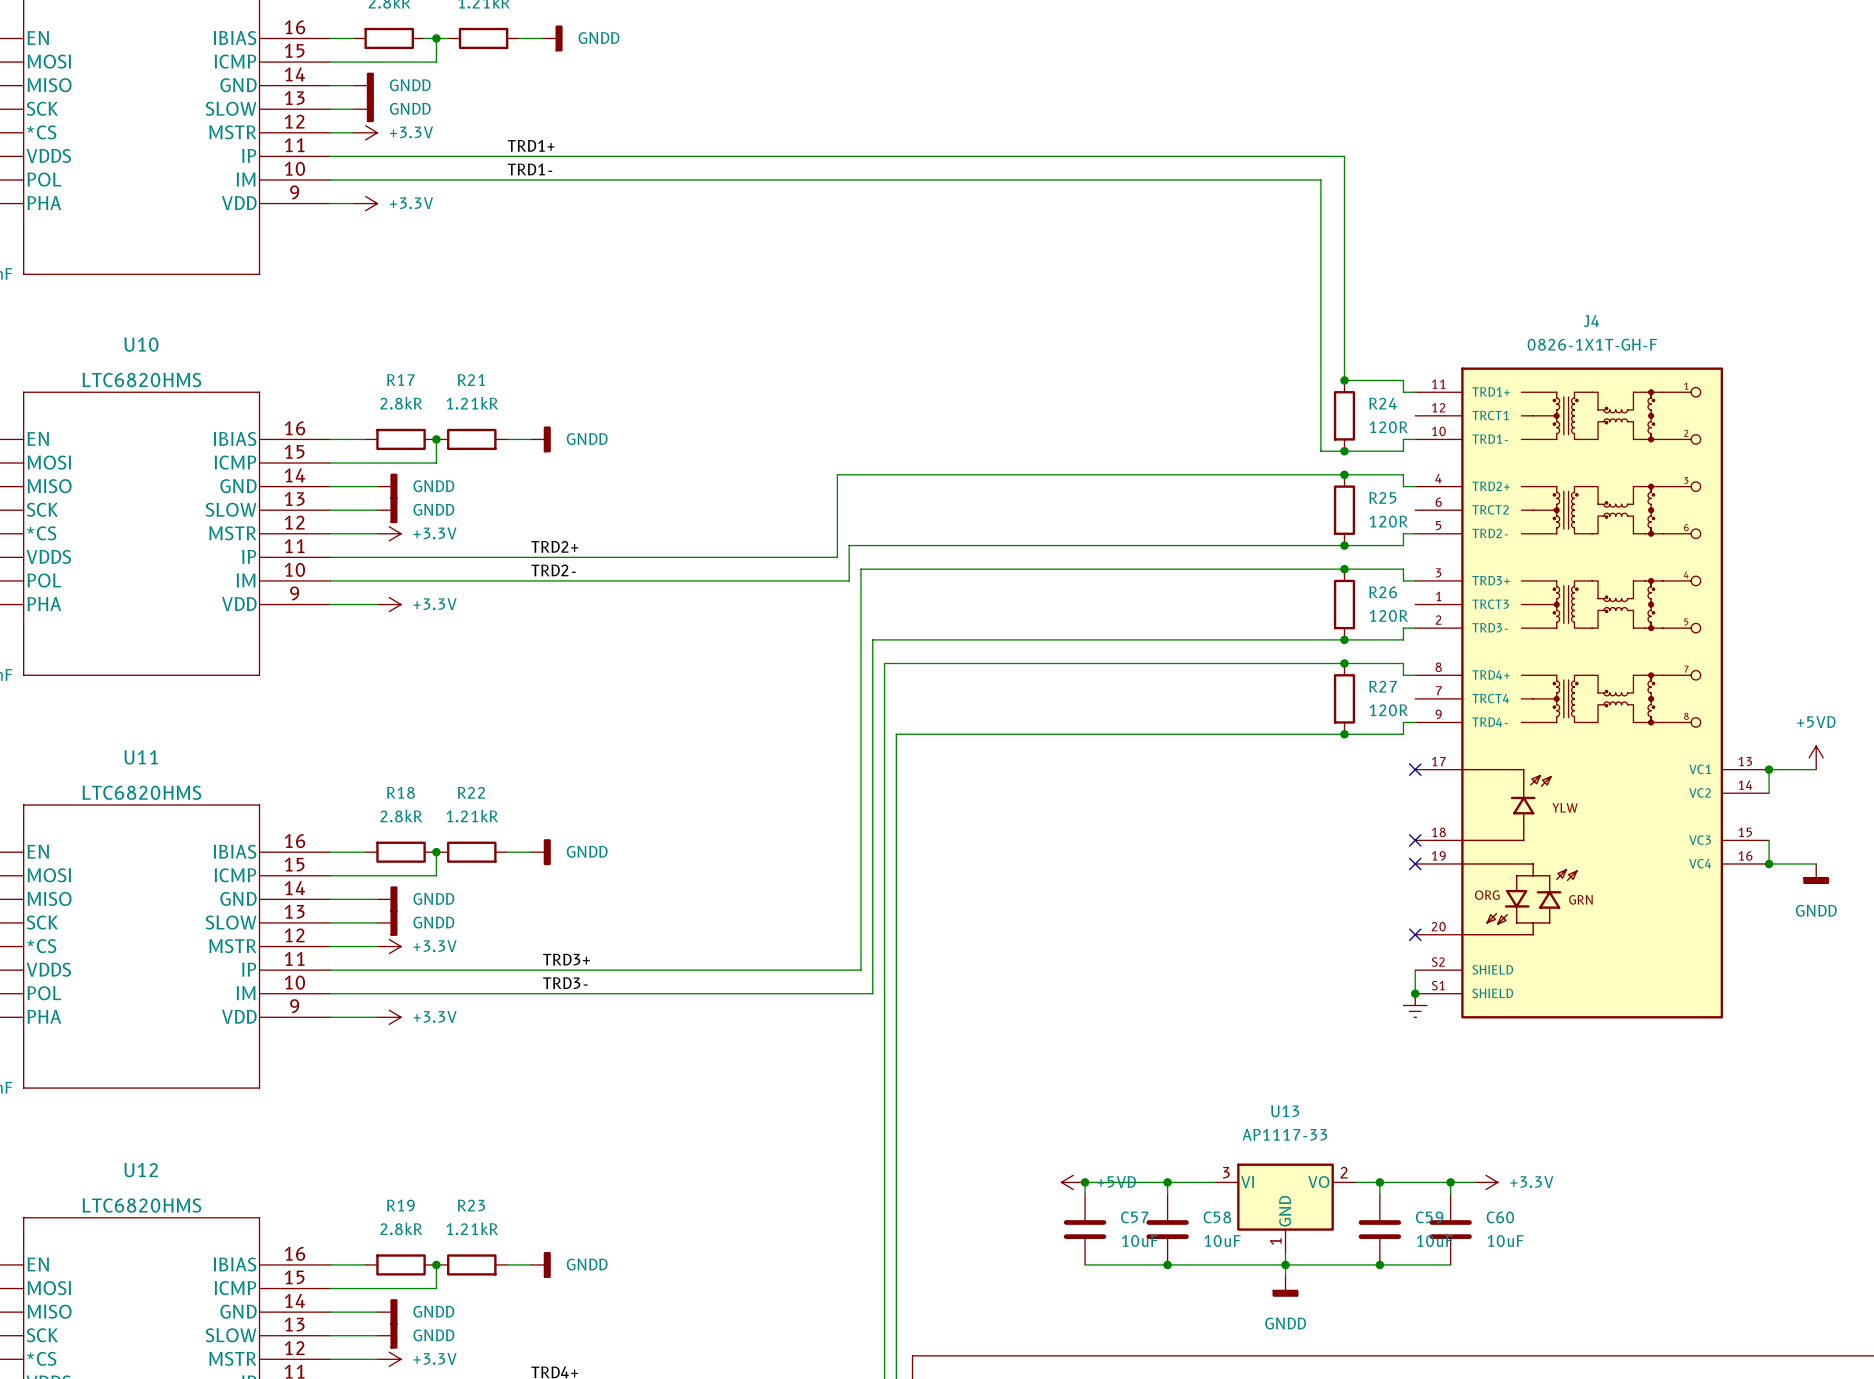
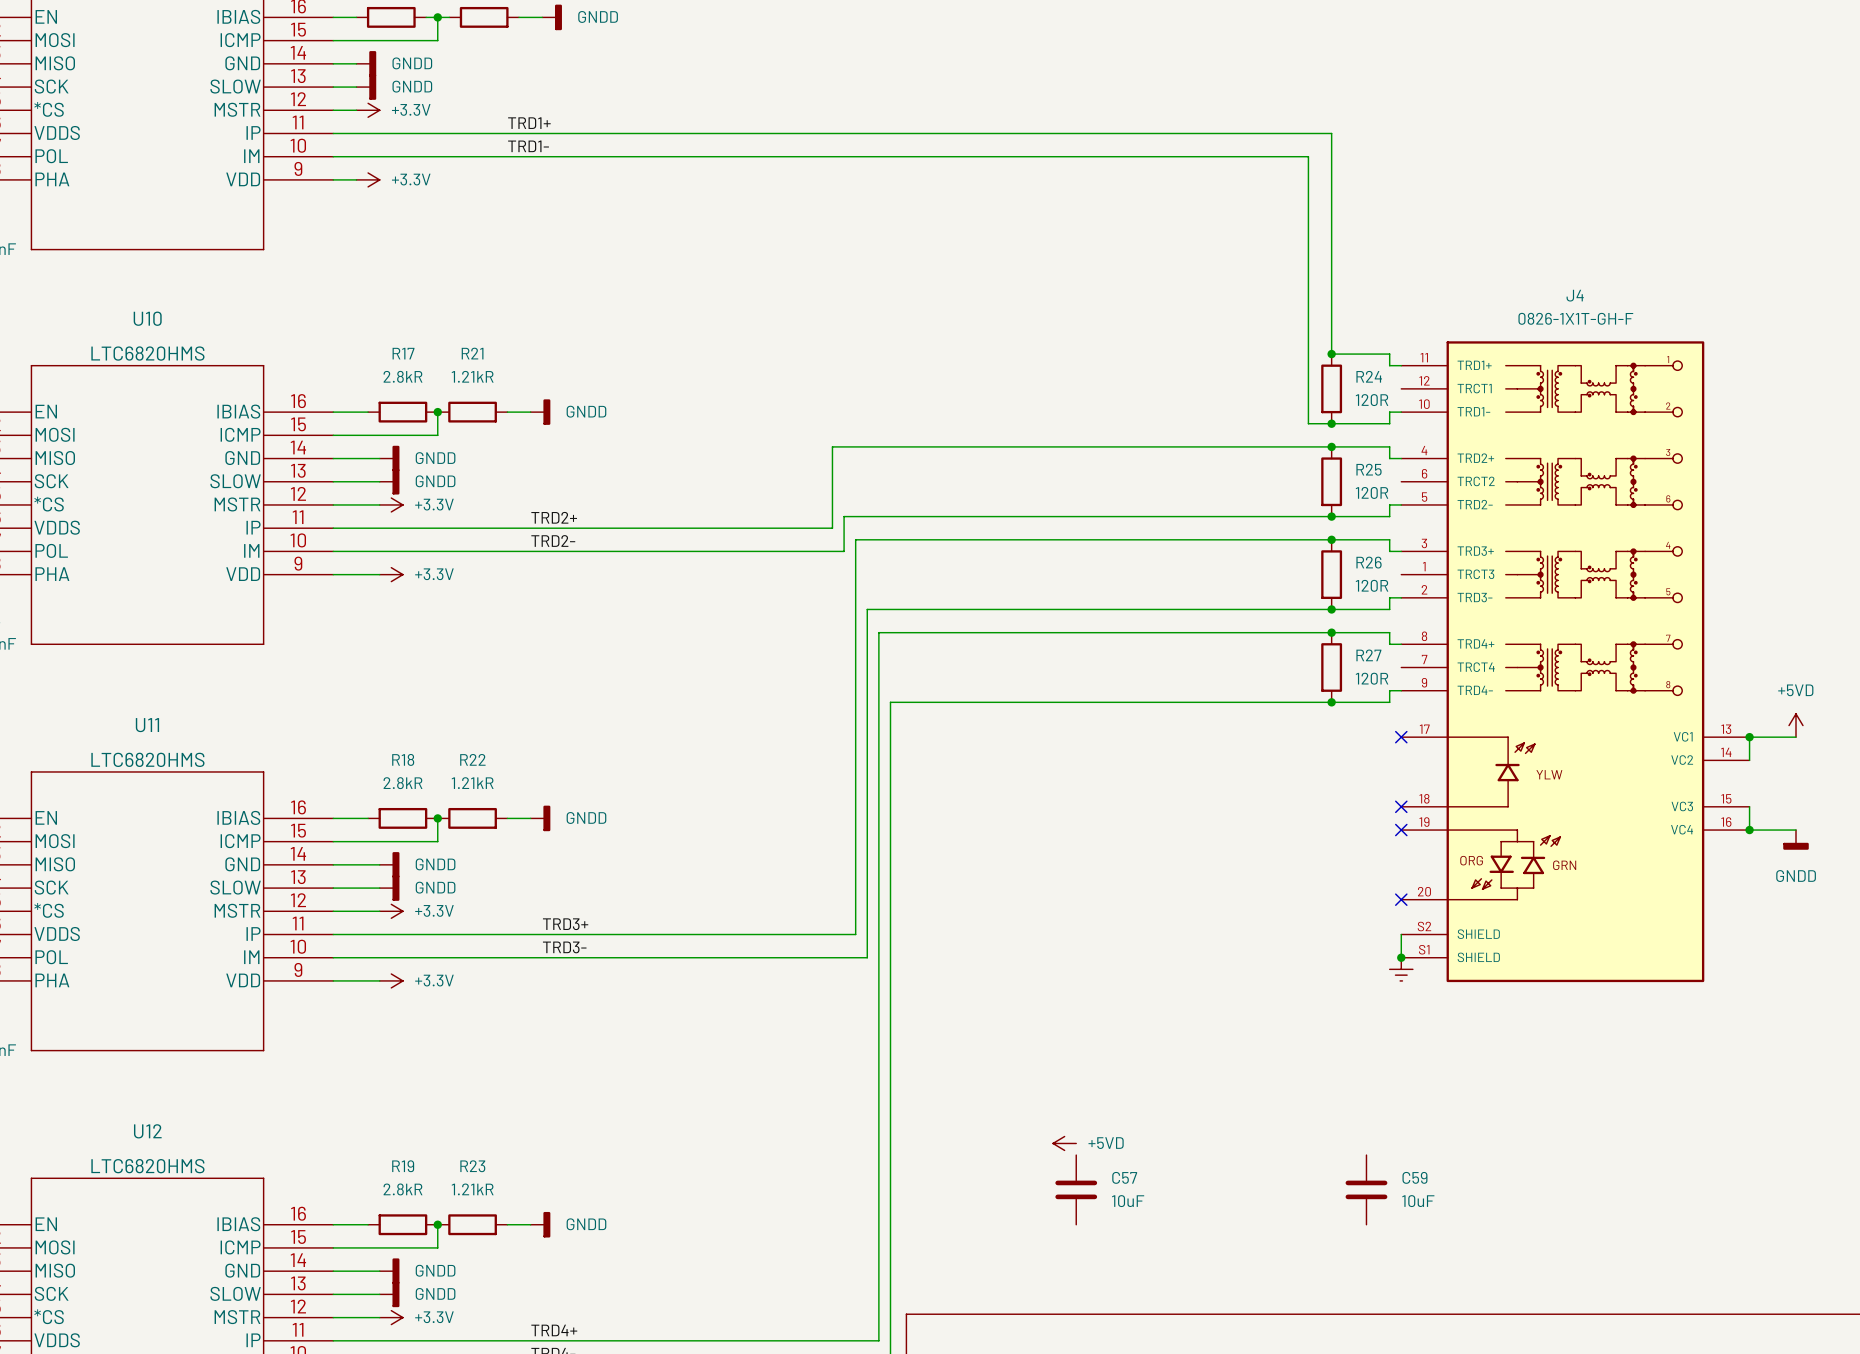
junction: (1085, 1182) -> none
wire: (1167, 1182) (1167, 1194) -> none
junction: (1167, 1182) -> none
wire: (1214, 1182) (1085, 1182) (1085, 1194) -> none
wire: (1356, 1182) (1474, 1182) -> none
wire: (1379, 1182) (1379, 1194) -> none
junction: (1379, 1182) -> none
wire: (1450, 1182) (1450, 1194) -> none
junction: (1450, 1182) -> none
power symbol: +3.3V (1486, 1182) -> none
U13: AP1117-33 (1285, 1208) -> none
C58: 10uF (1167, 1229) -> none
C60: 10uF (1450, 1229) -> none
wire: (1285, 1253) (1285, 1276) -> none
wire: (1085, 1264) (1450, 1264) -> none
junction: (1167, 1264) -> none
junction: (1285, 1264) -> none
junction: (1379, 1264) -> none
power symbol: GNDD (1285, 1286) -> none

